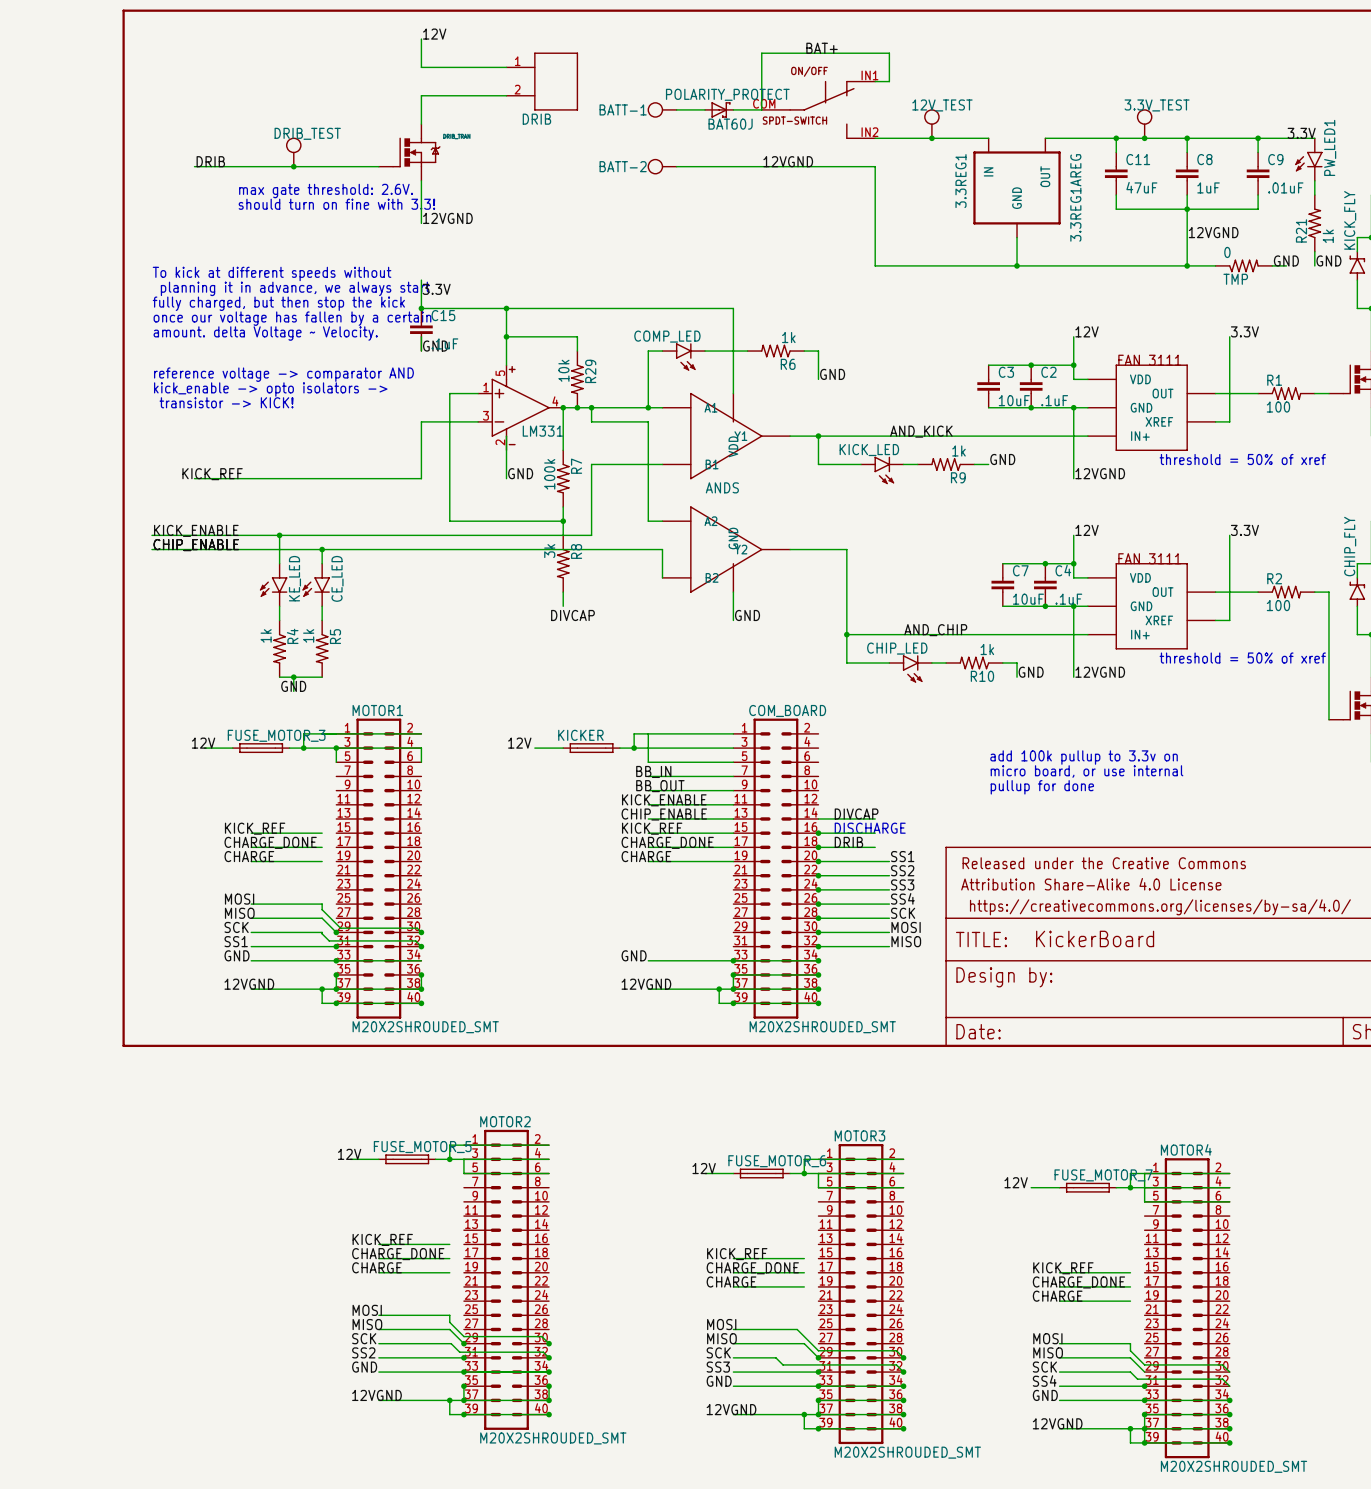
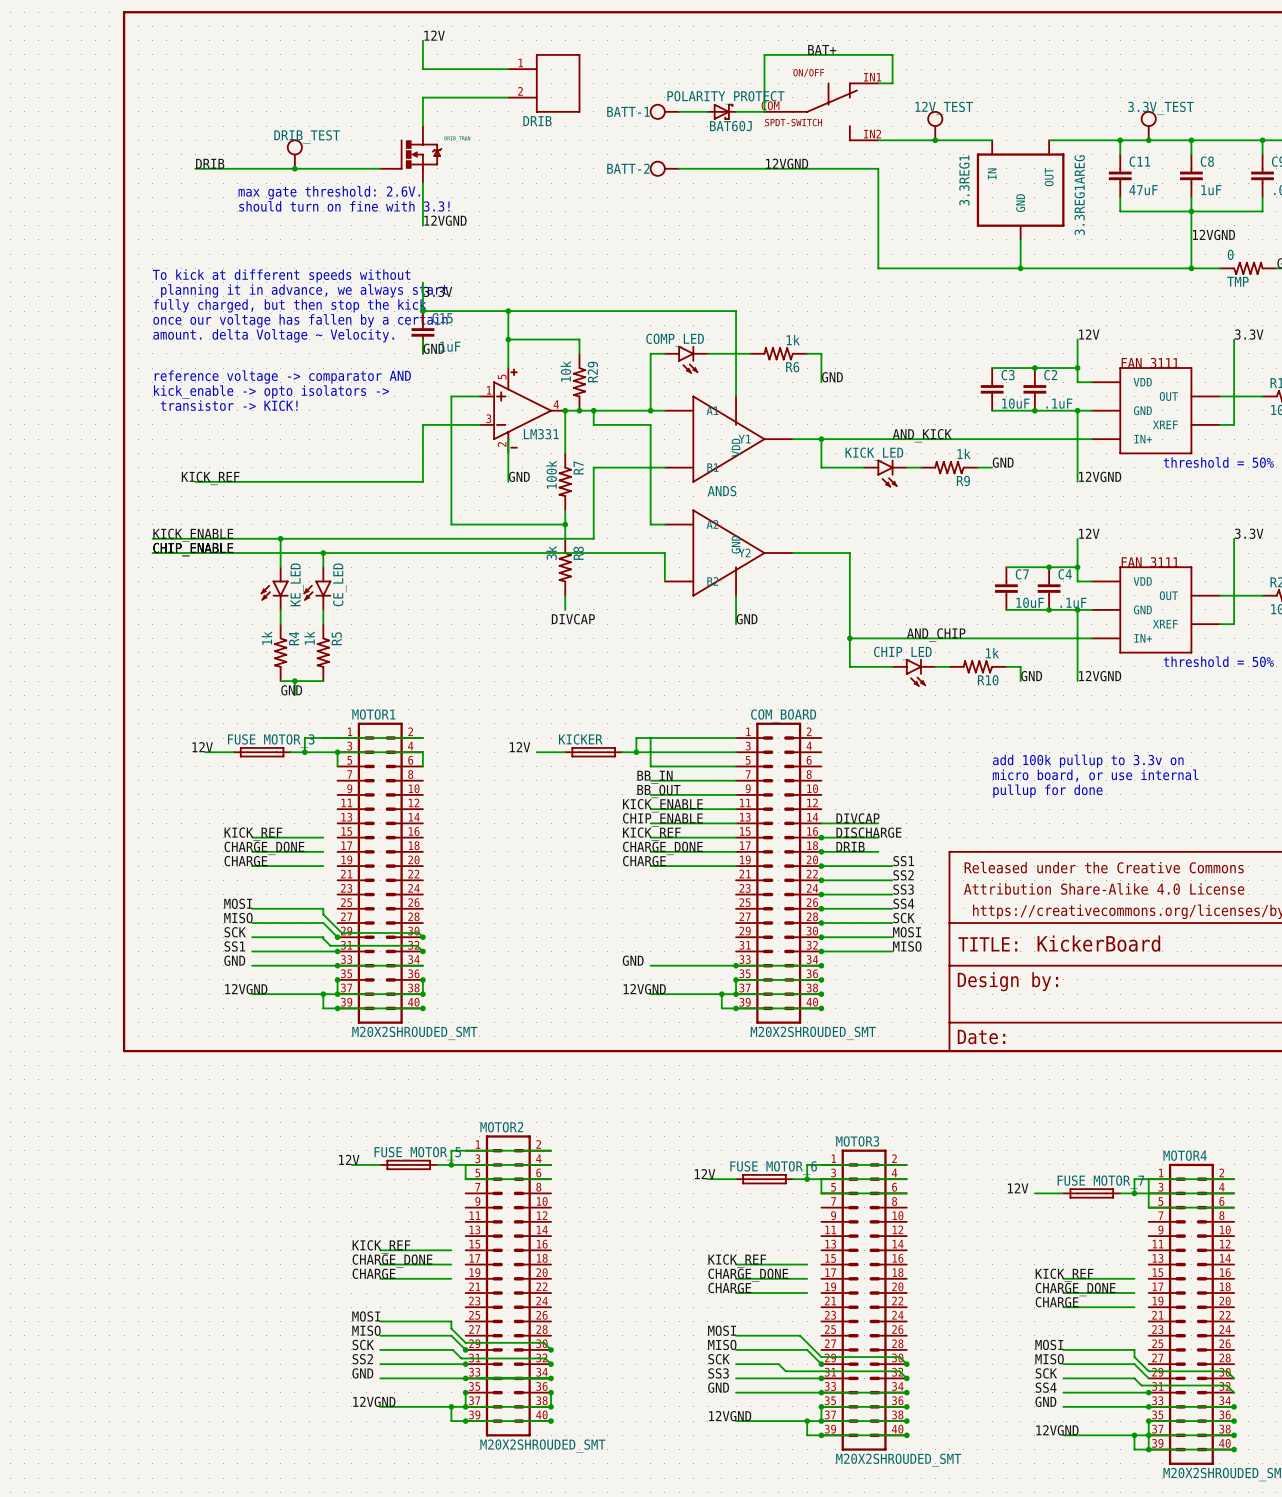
text: DISCHARGE (870, 828) -> none
label: none -> DISCHARGE (868, 832)

